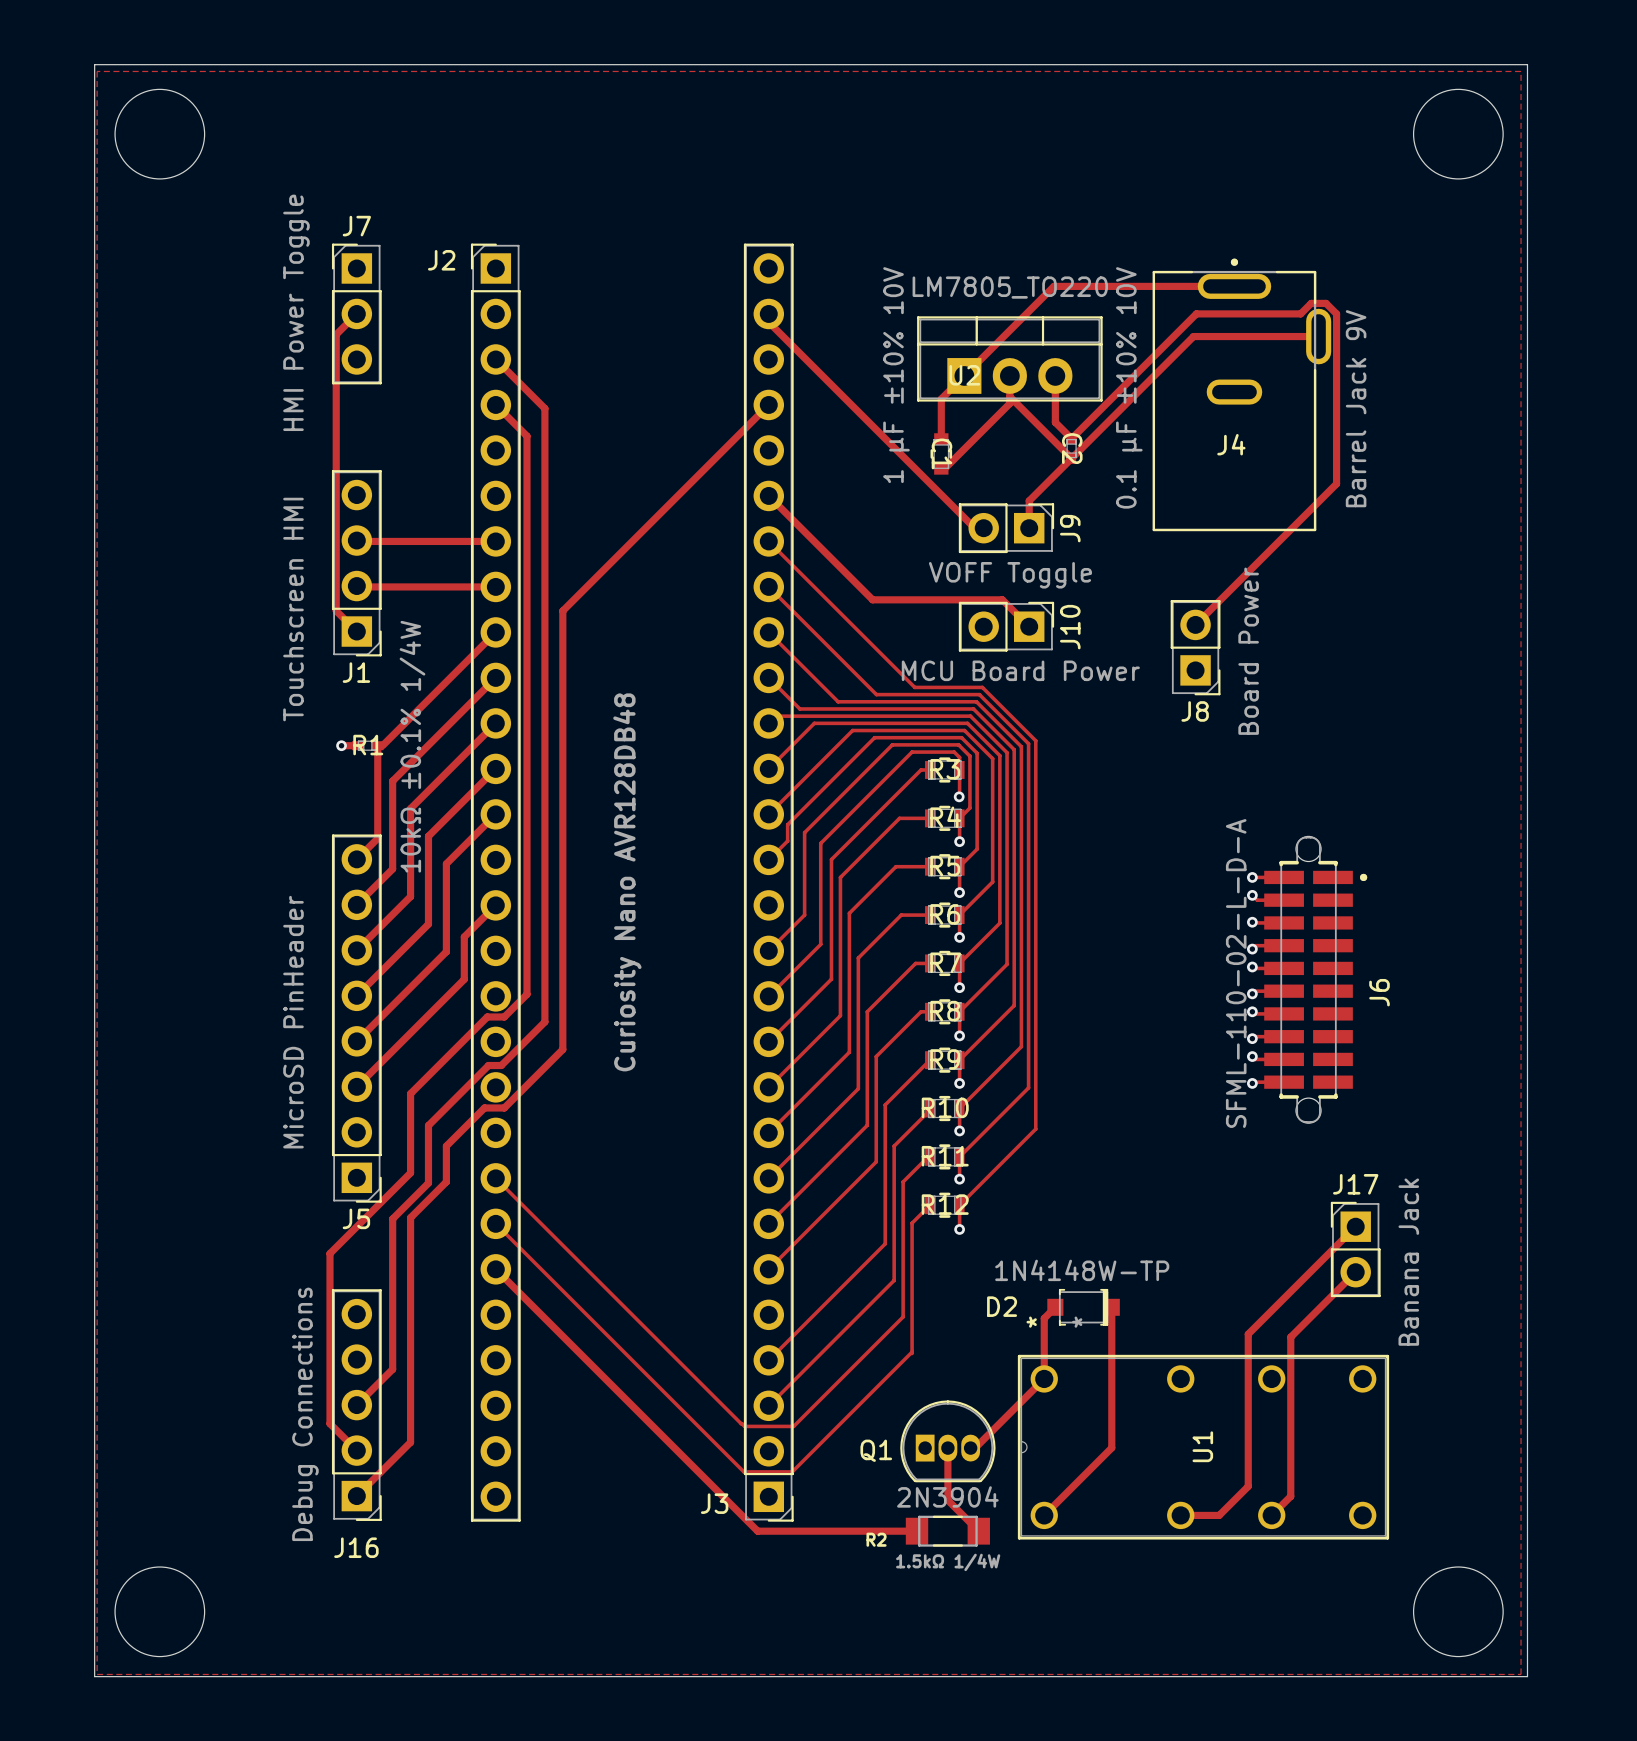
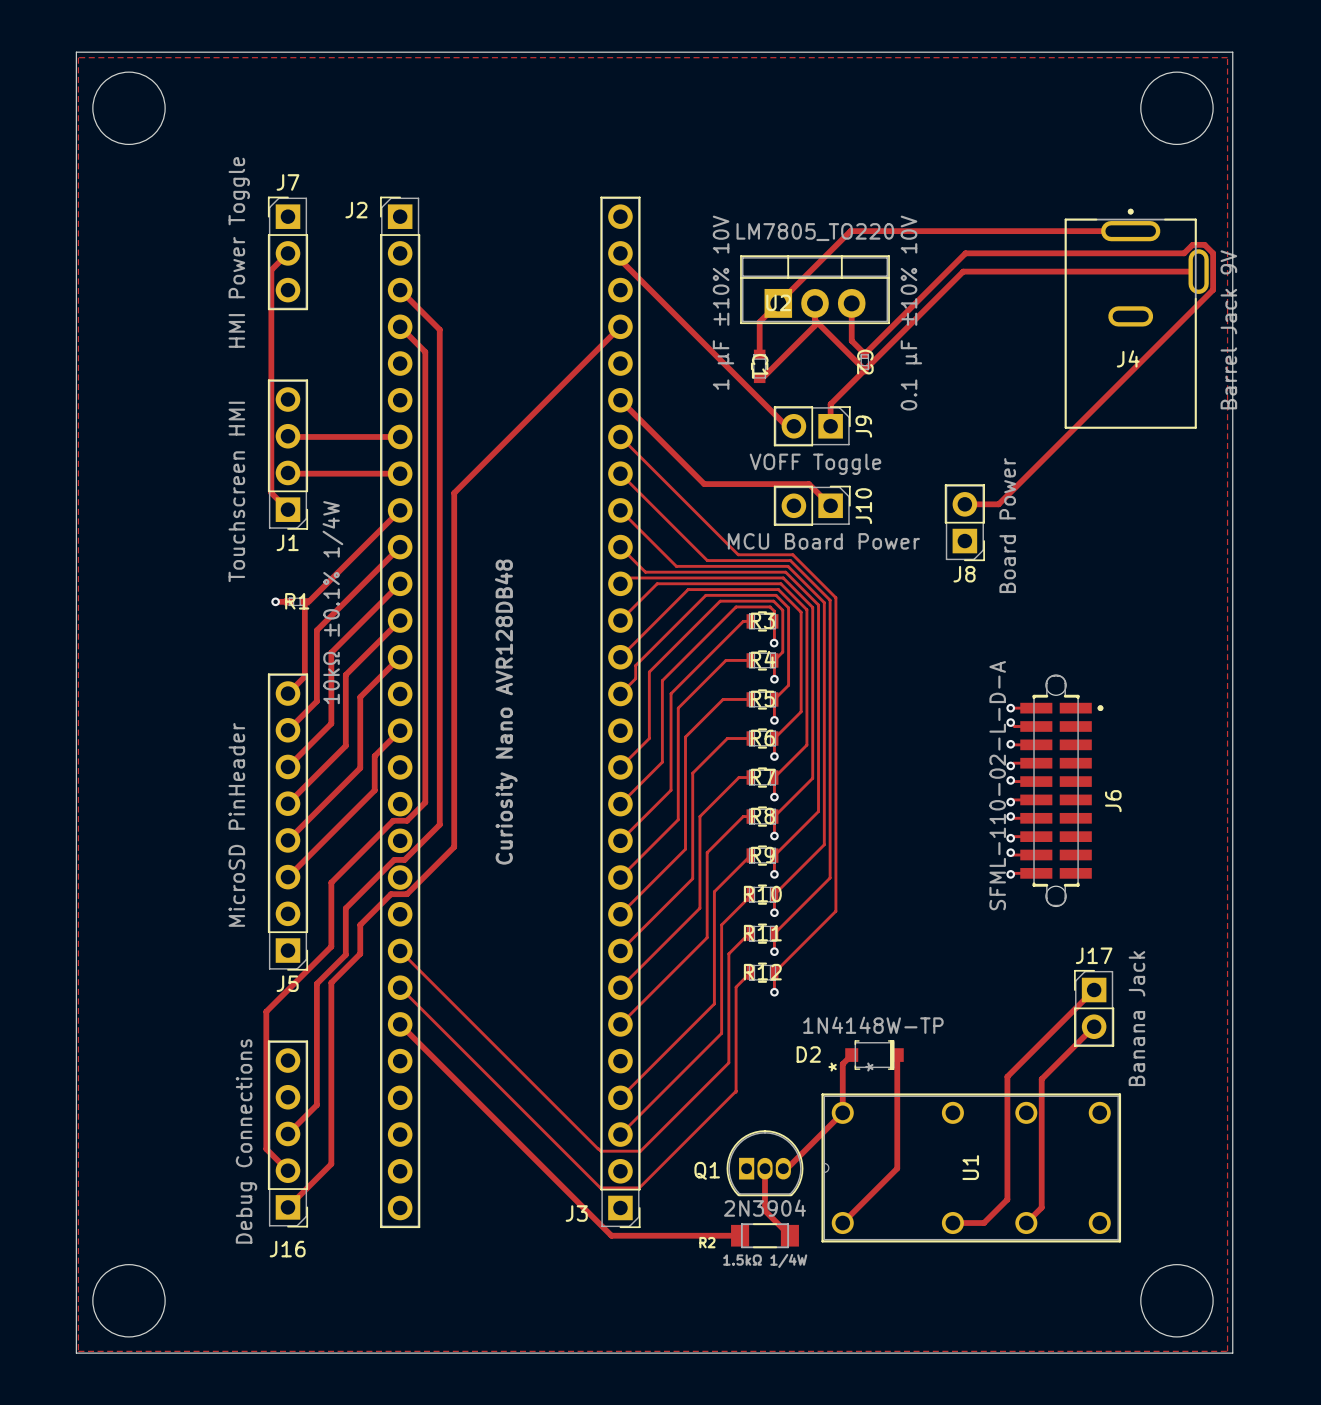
track: none -> (996, 231) (1130, 231)
track: (1300, 313) (1311, 303) (1326, 303) (1336, 313) (1336, 483) (1195, 624) -> (1049, 253) (1184, 253) (1192, 244) (1204, 244) (1213, 253) (1213, 289) (998, 504) (964, 504)
track: none -> (1064, 271) (1198, 271)
J4 position: (1241, 394) -> (1136, 318)

